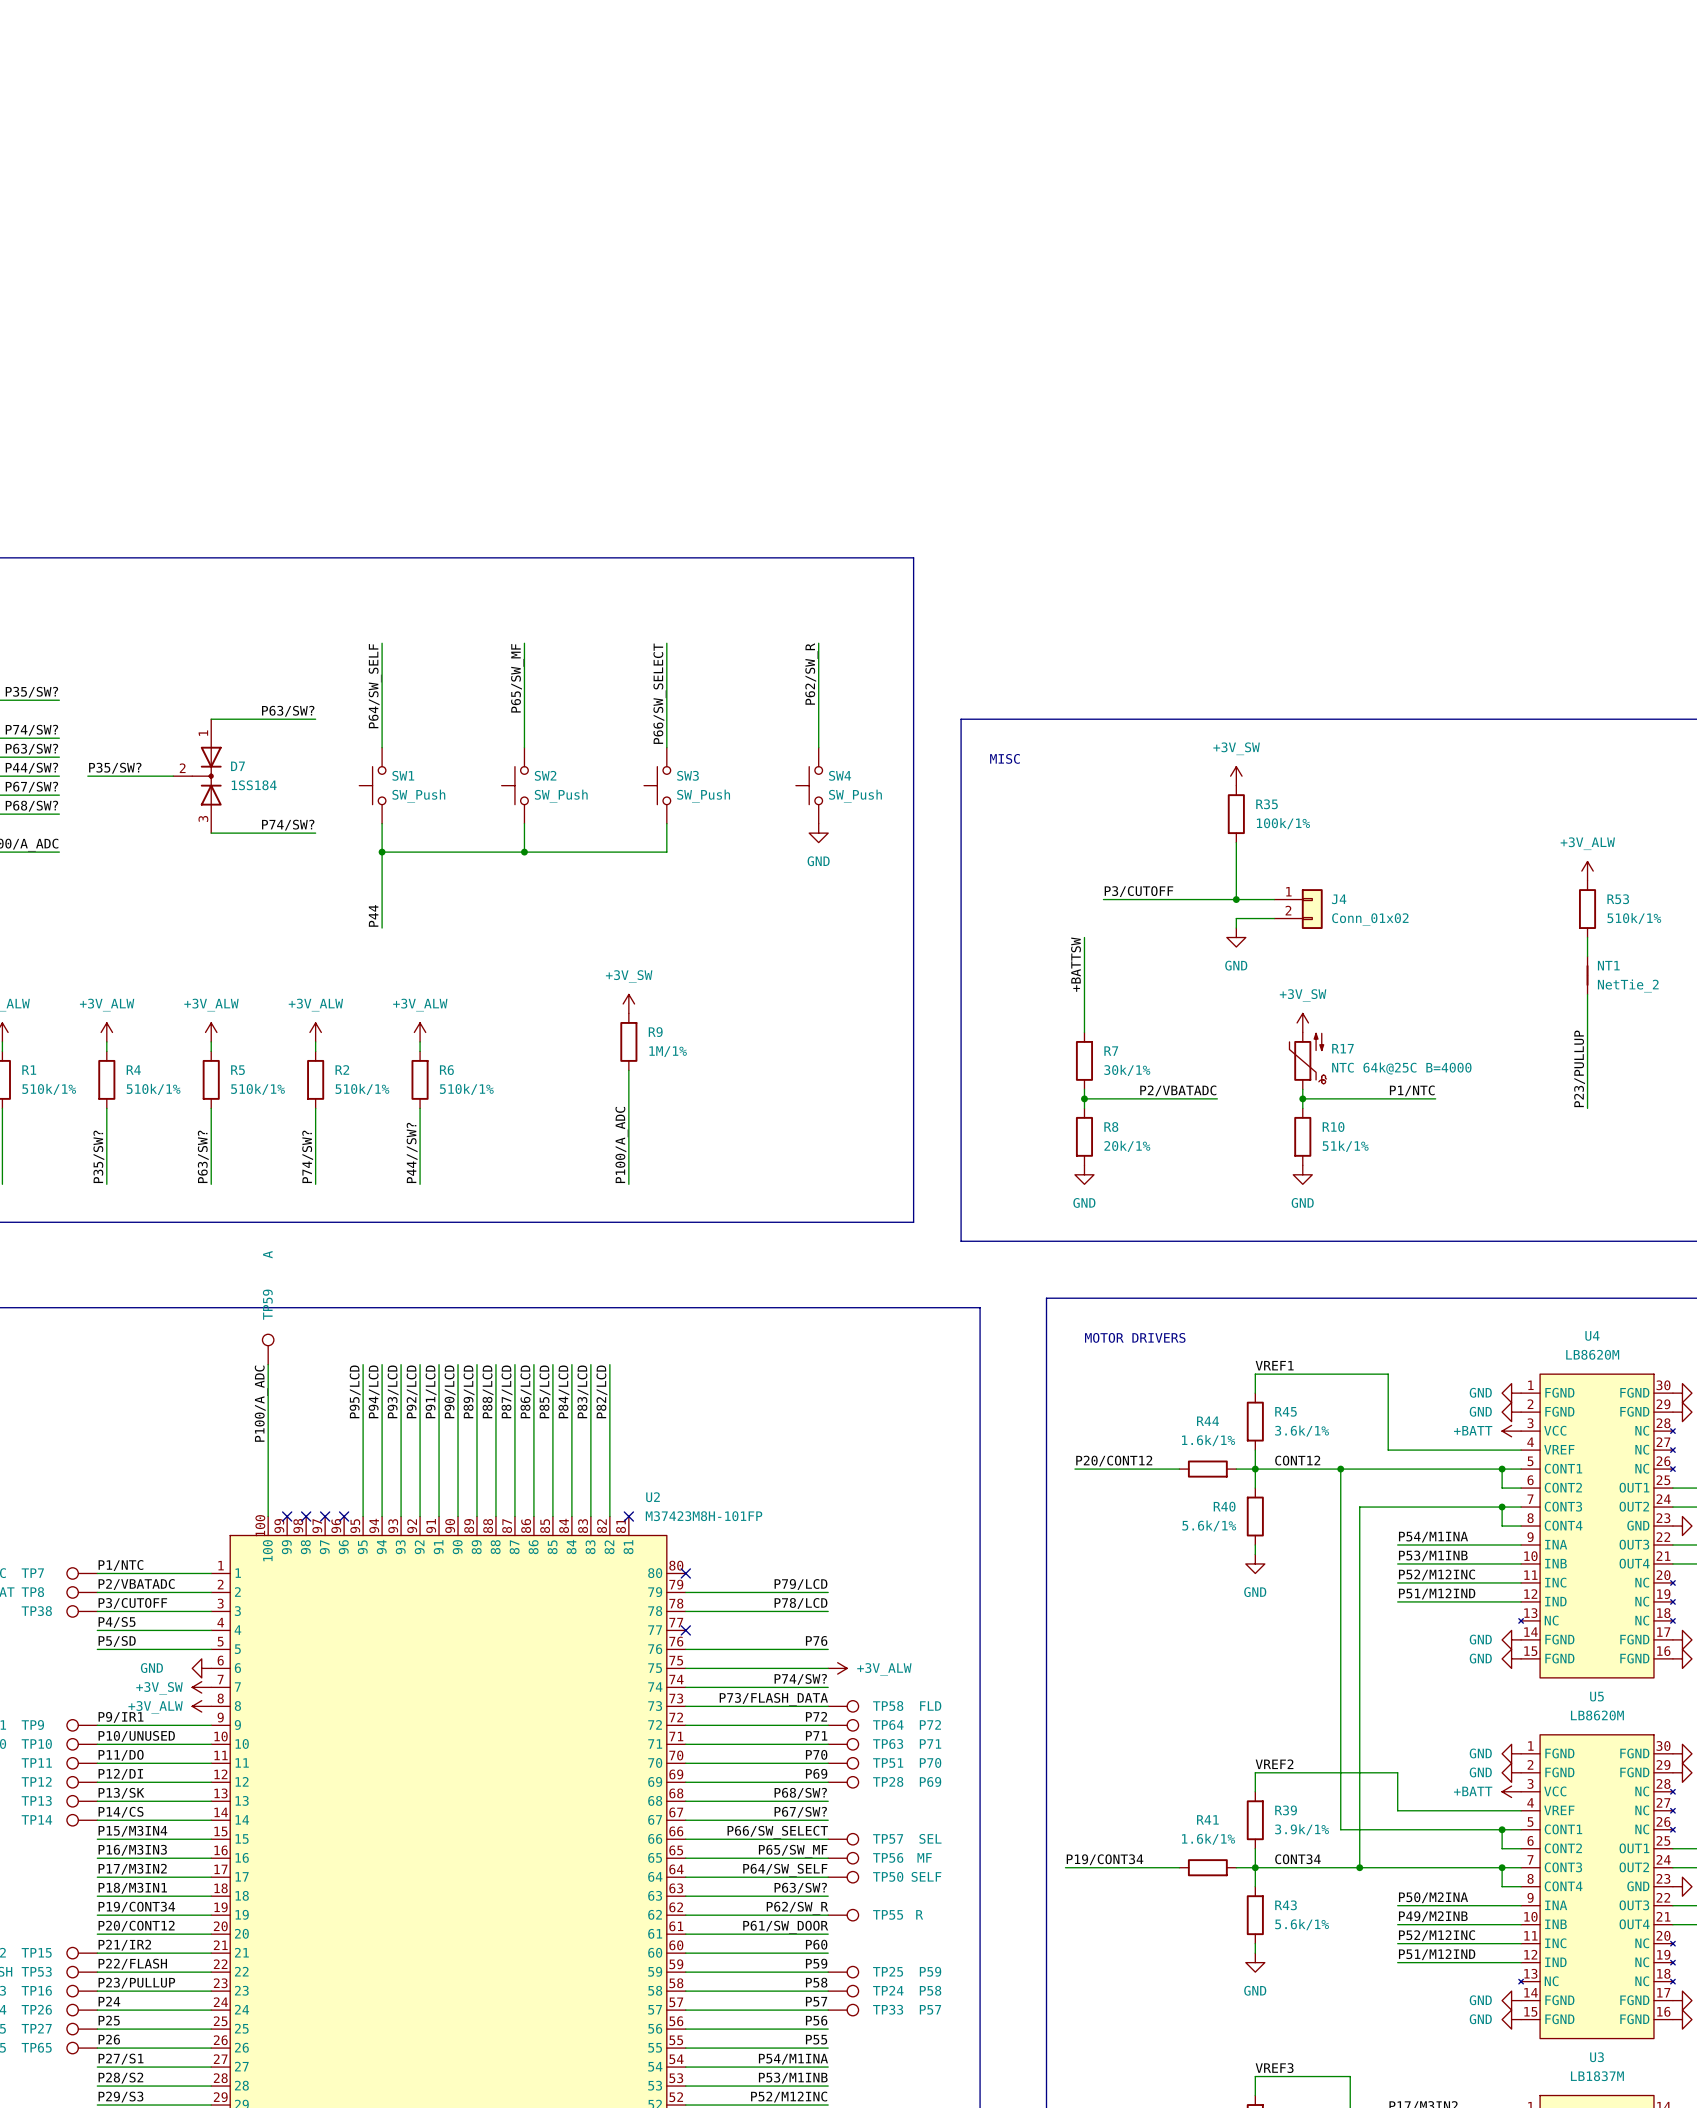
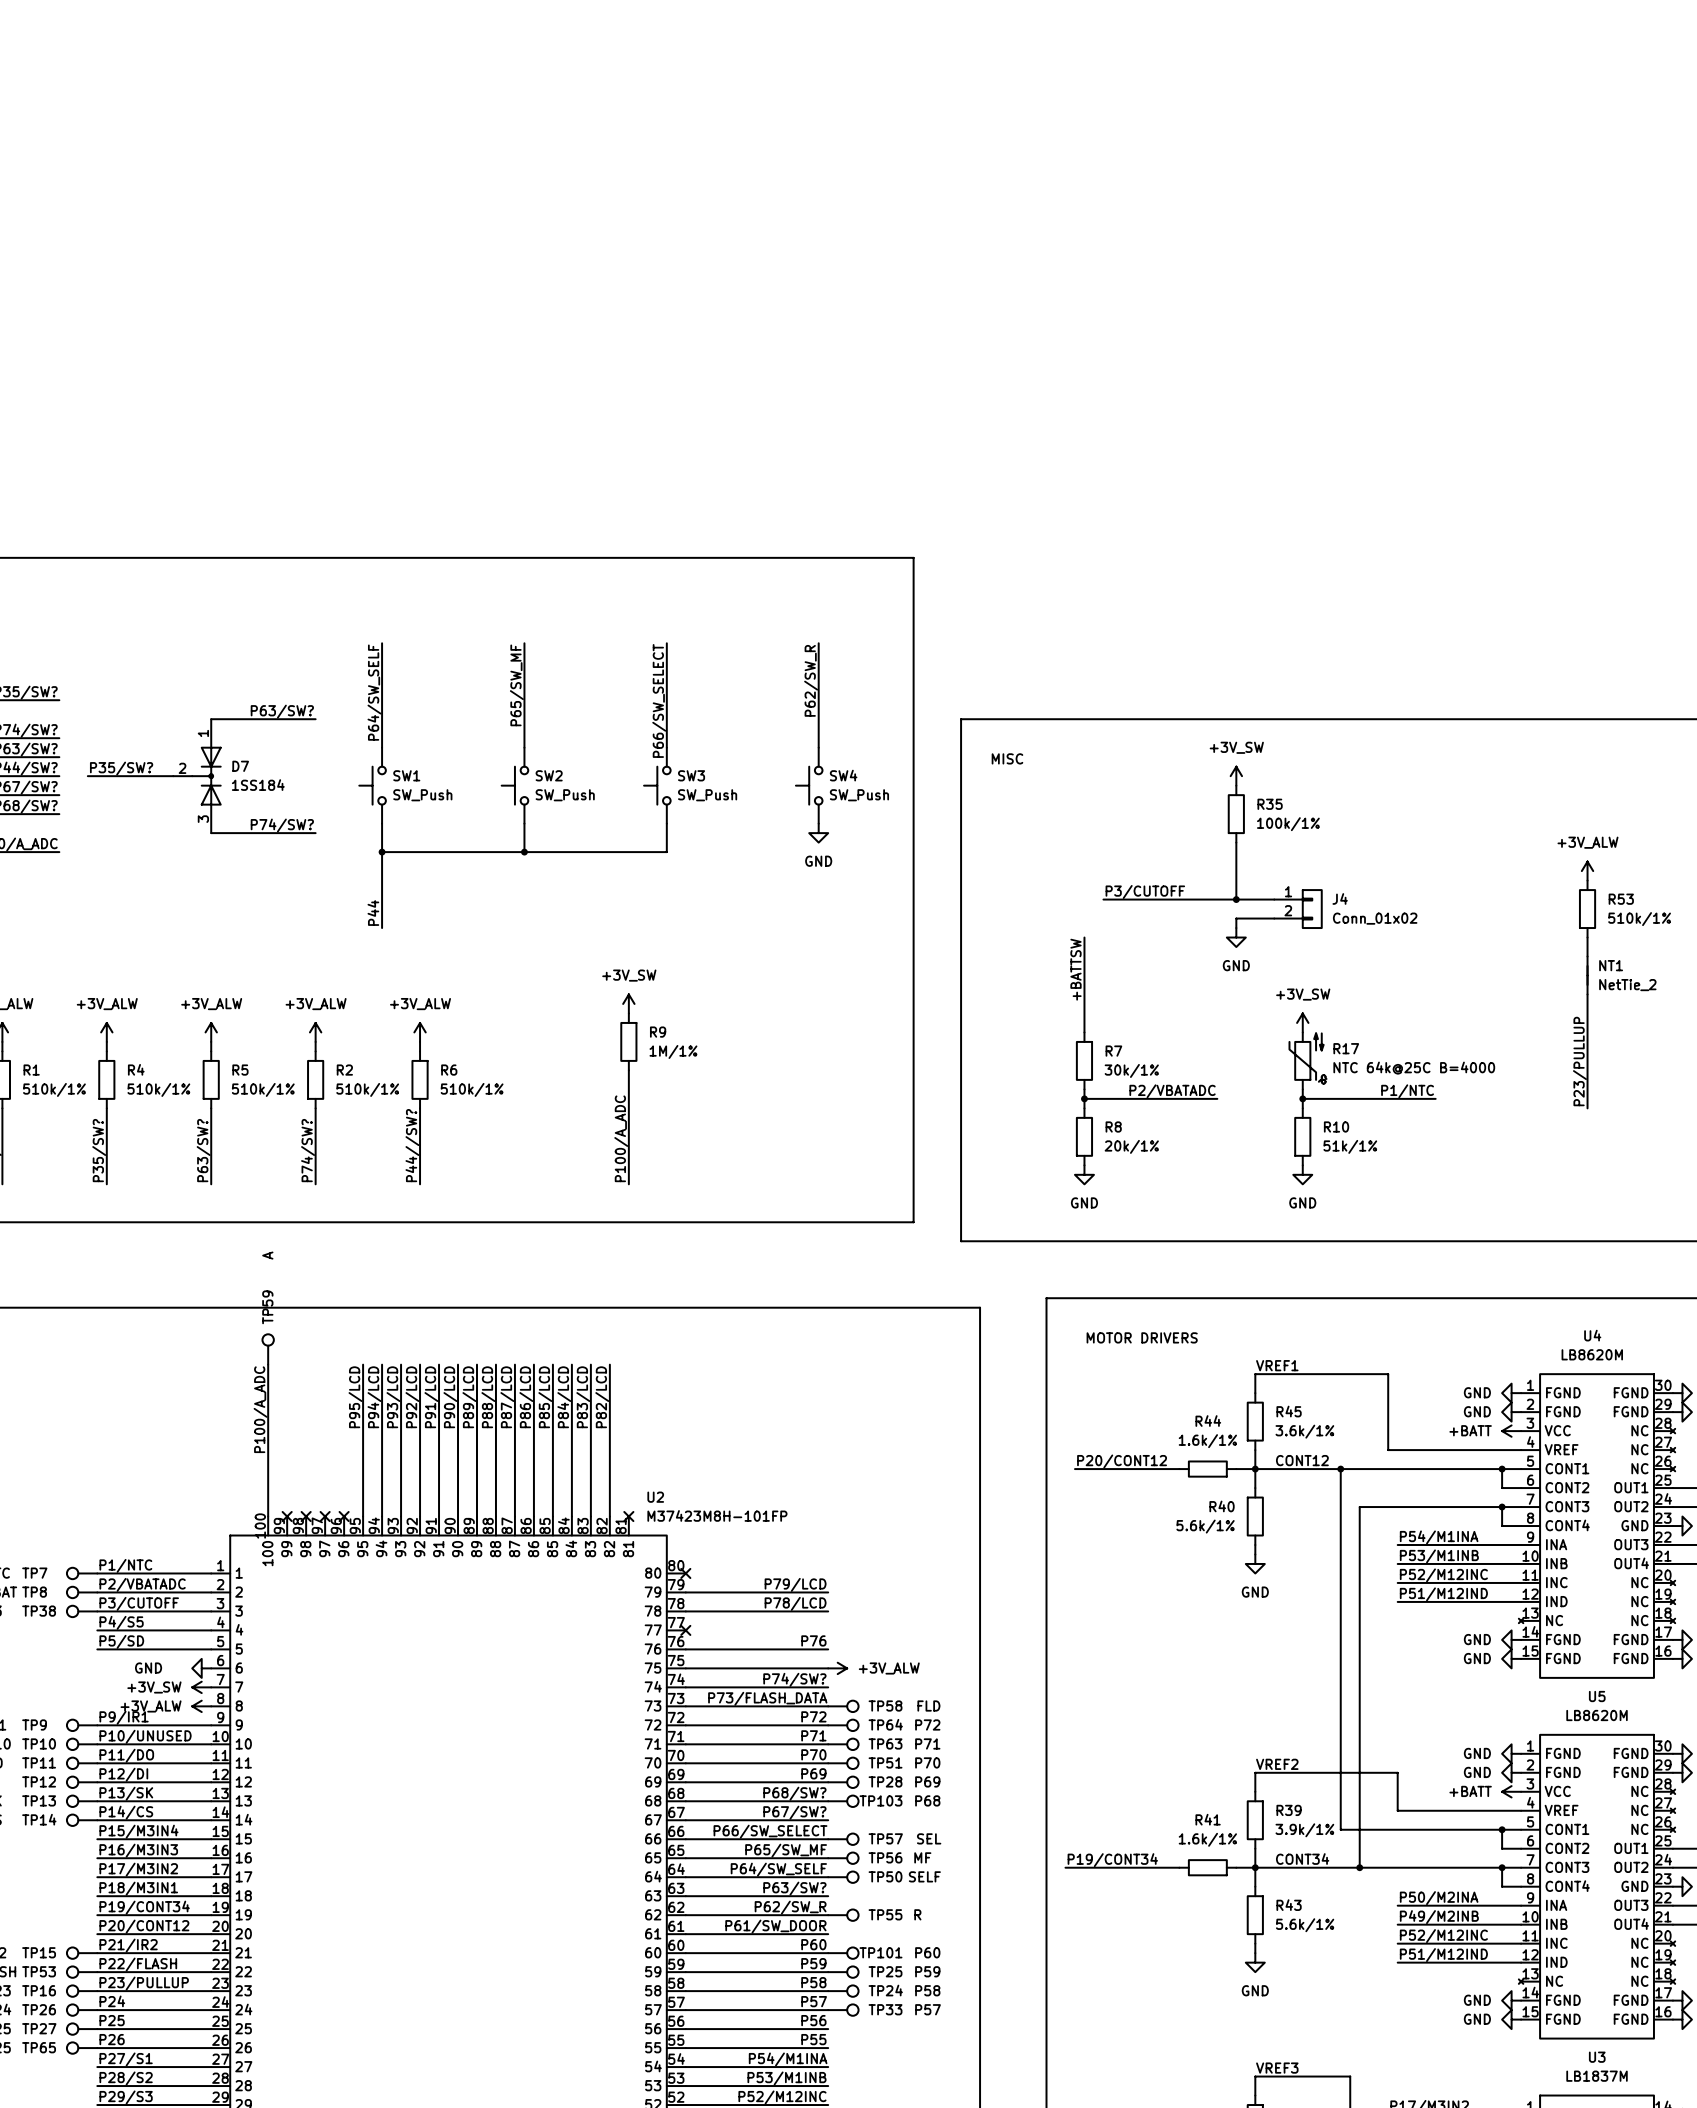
TP103: none -> P68 (843, 1801)
TP101: none -> P60 (843, 1953)

